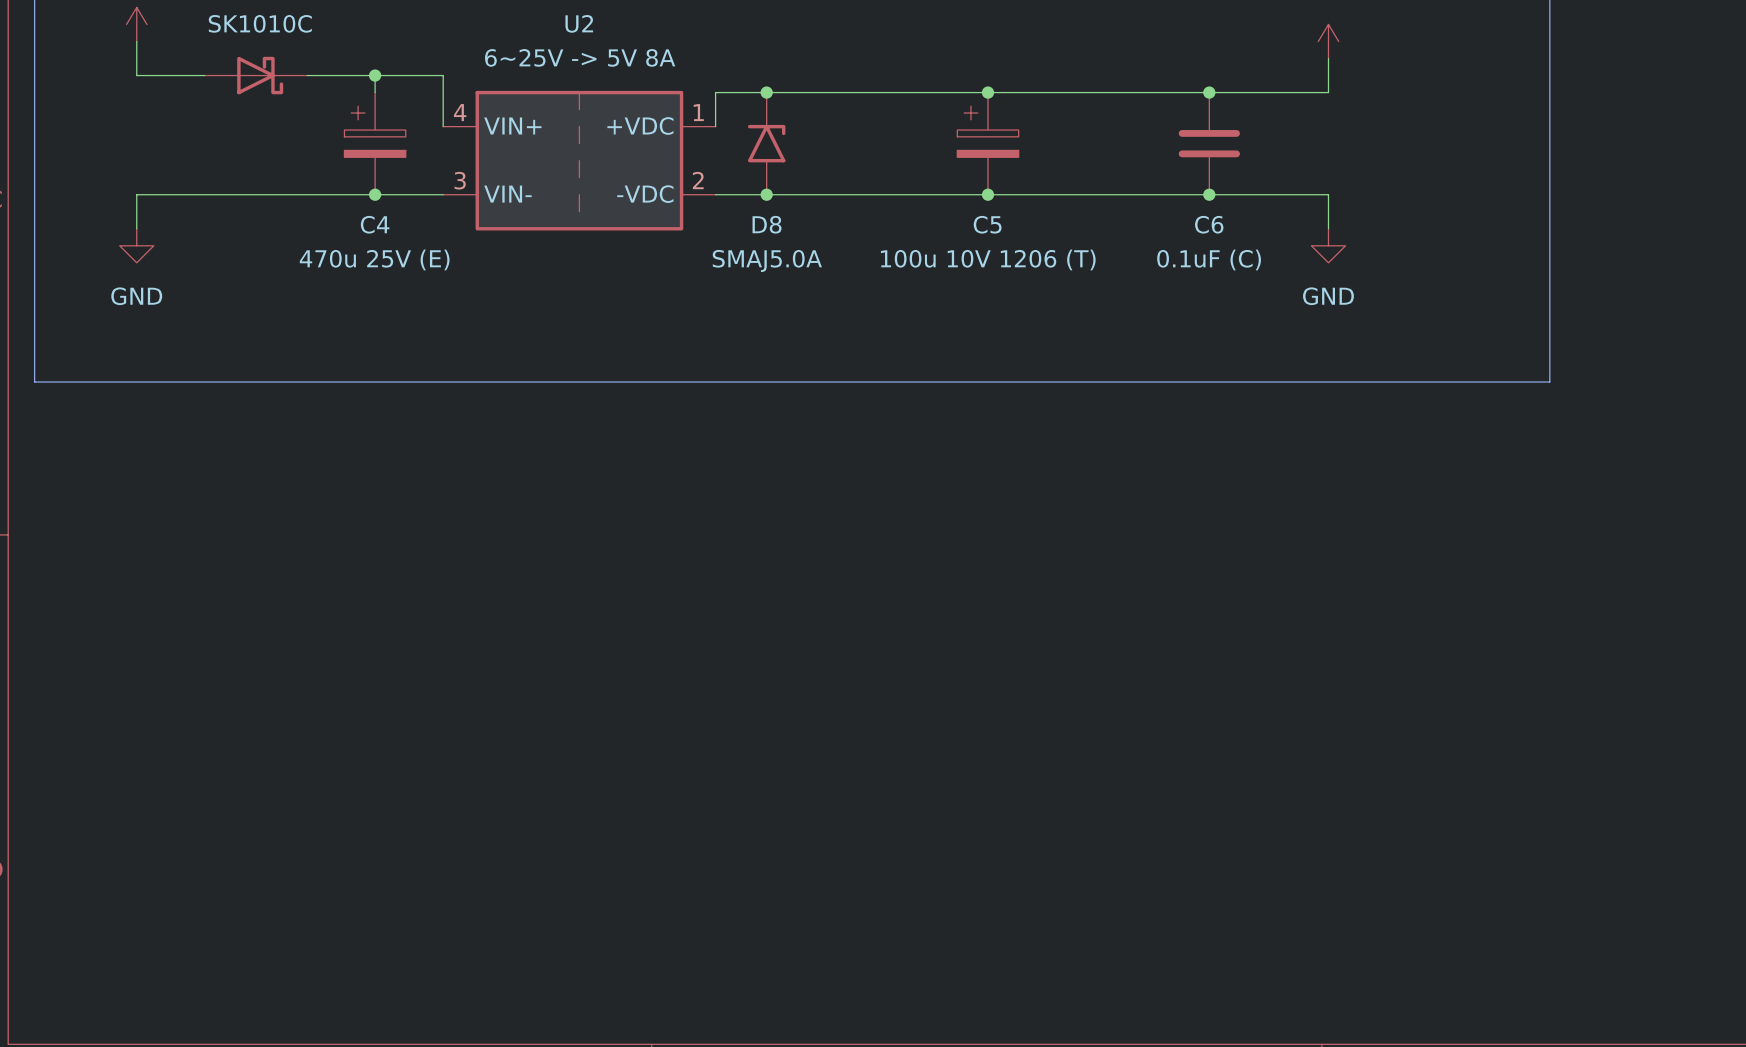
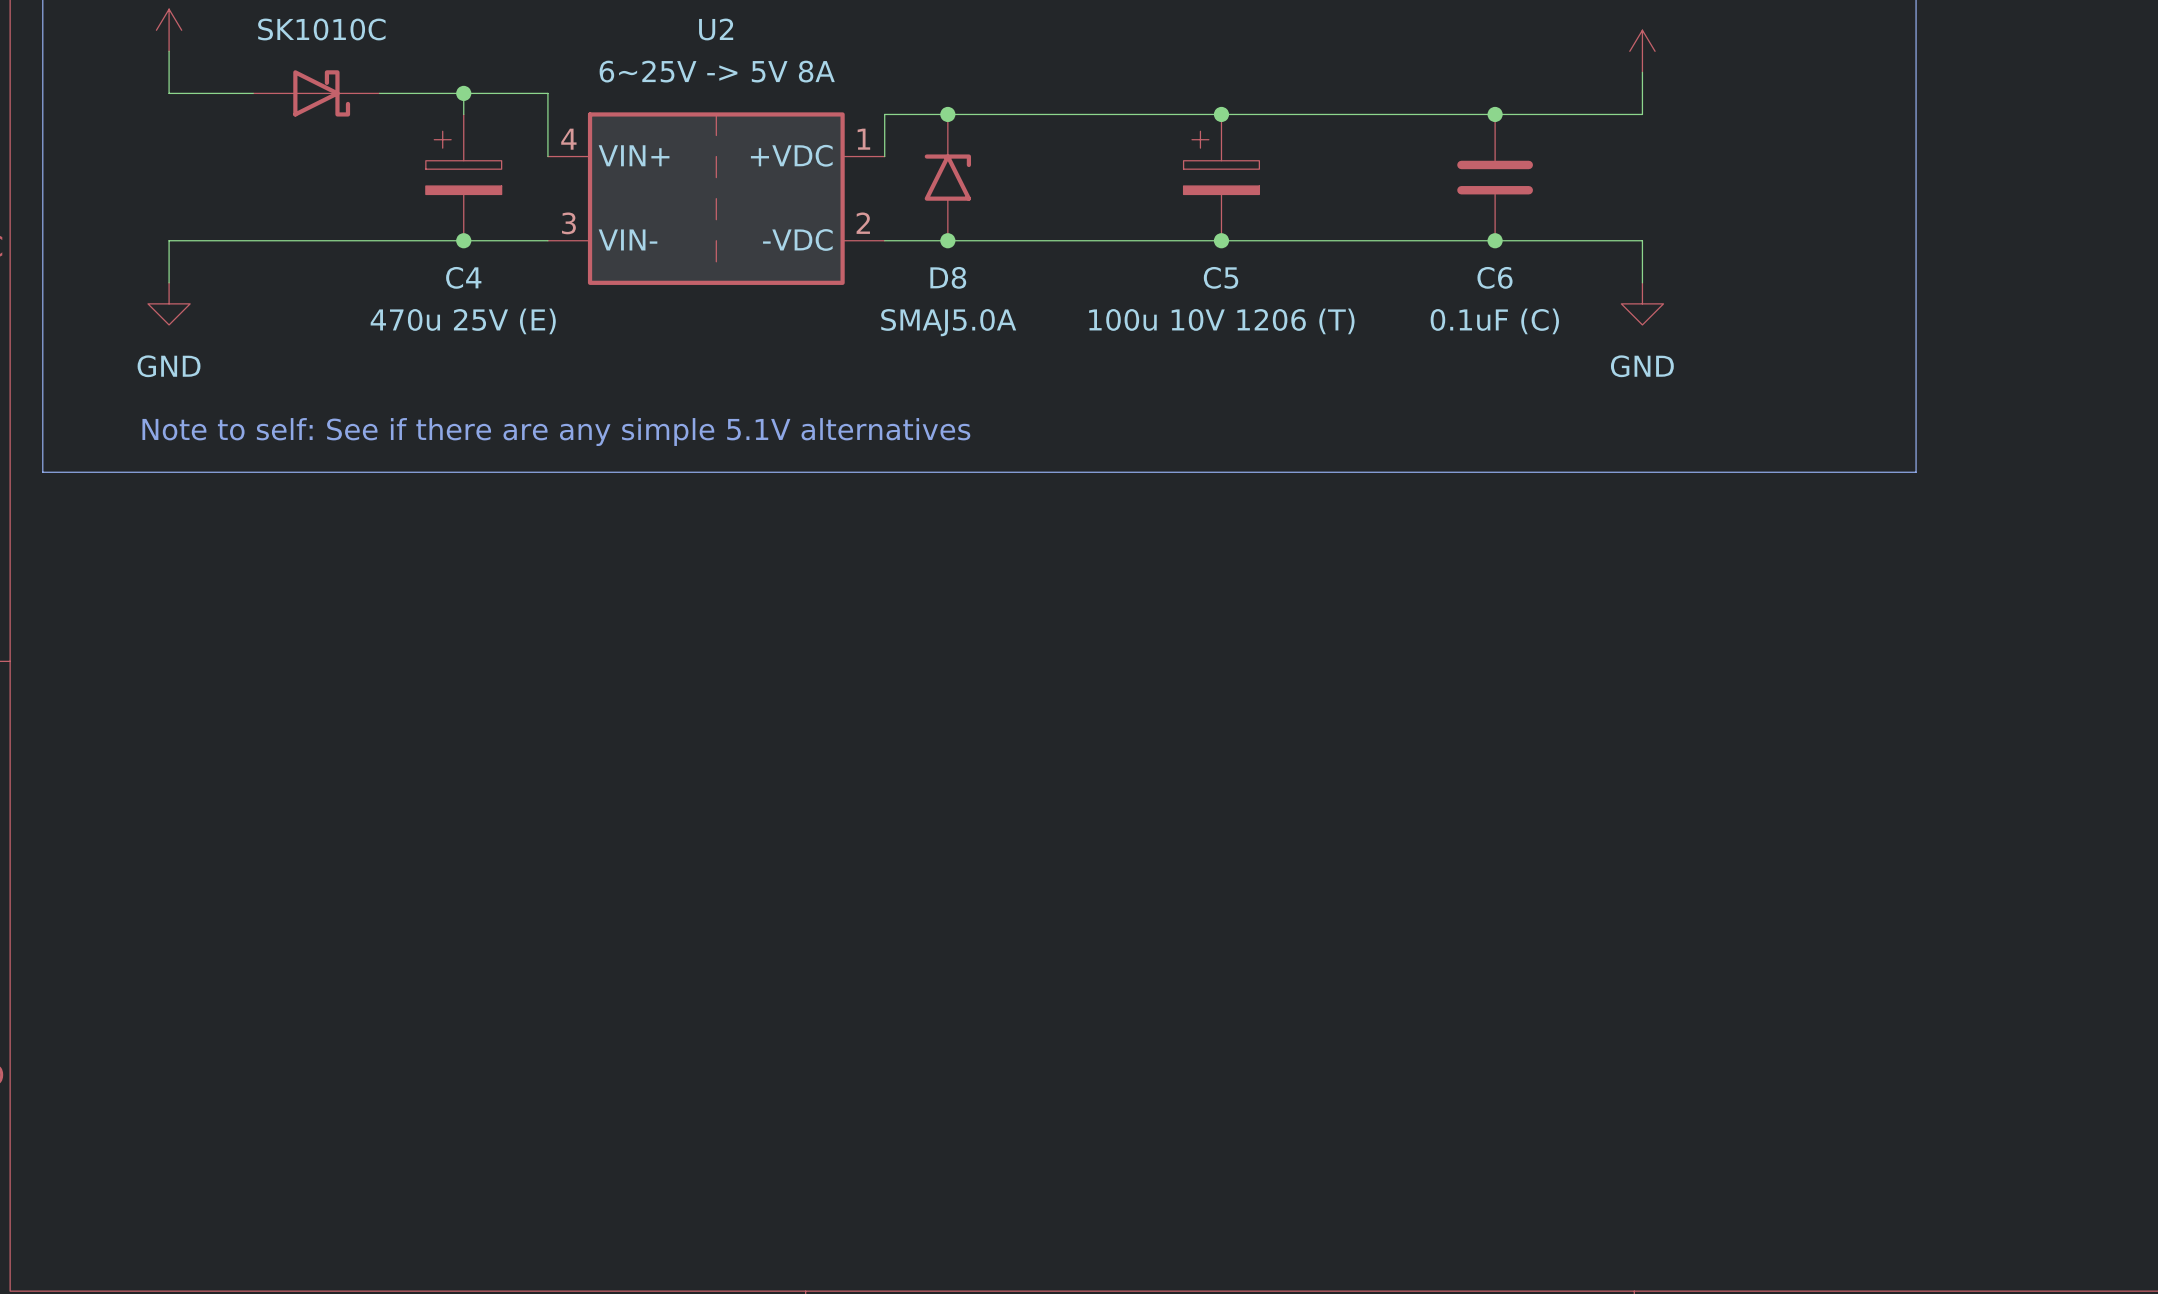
text: none -> Note to self: See if there are any simple 5.1V alternatives (556, 432)

